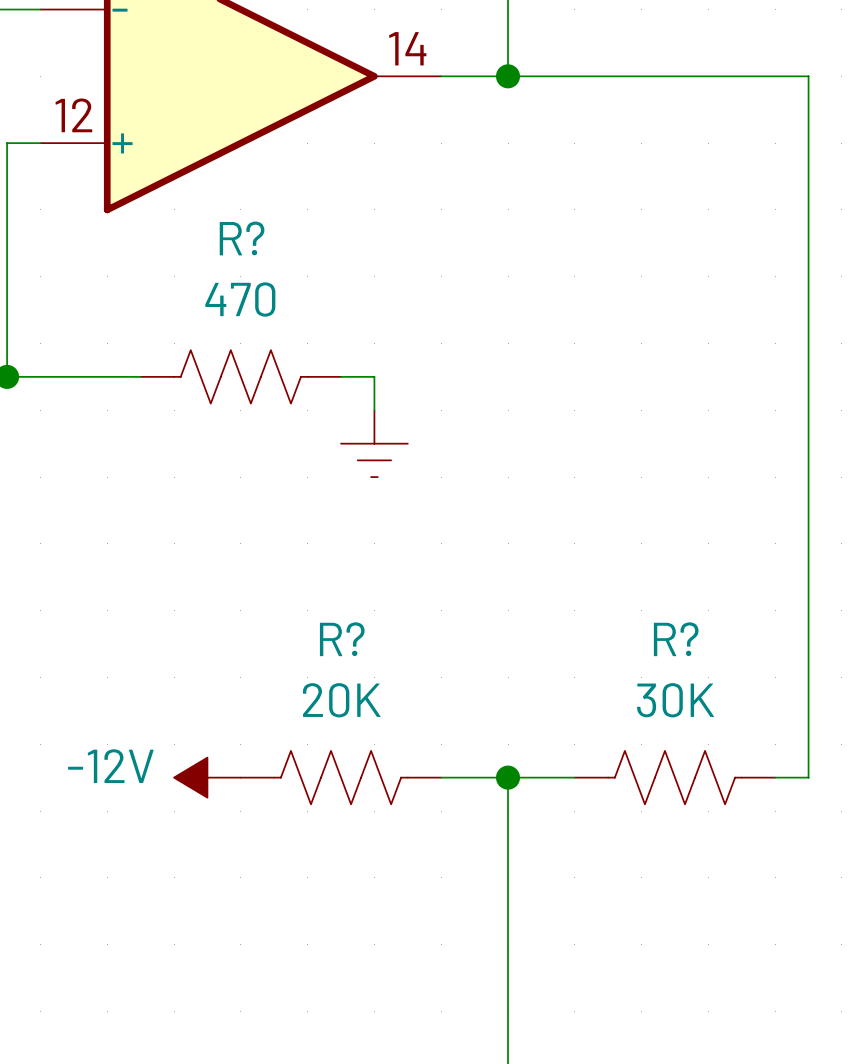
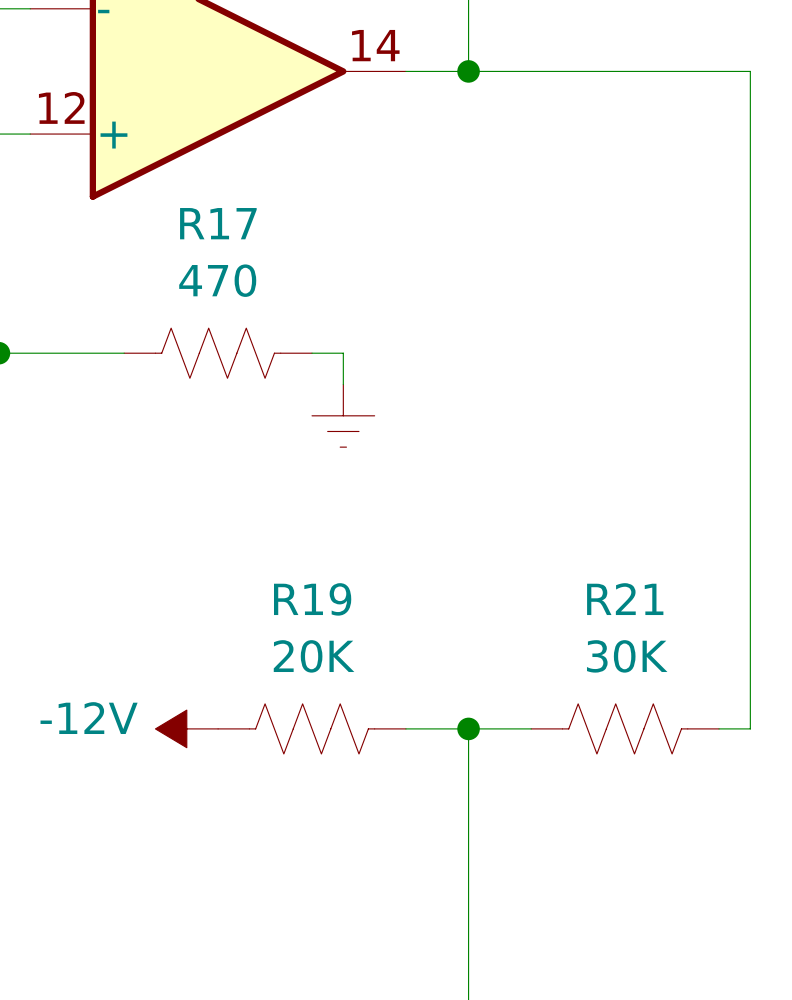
R? name: R? (242, 238) -> R17 (218, 223)
R? name: R? (342, 639) -> R19 (312, 599)
R? name: R? (676, 639) -> R21 (625, 599)

